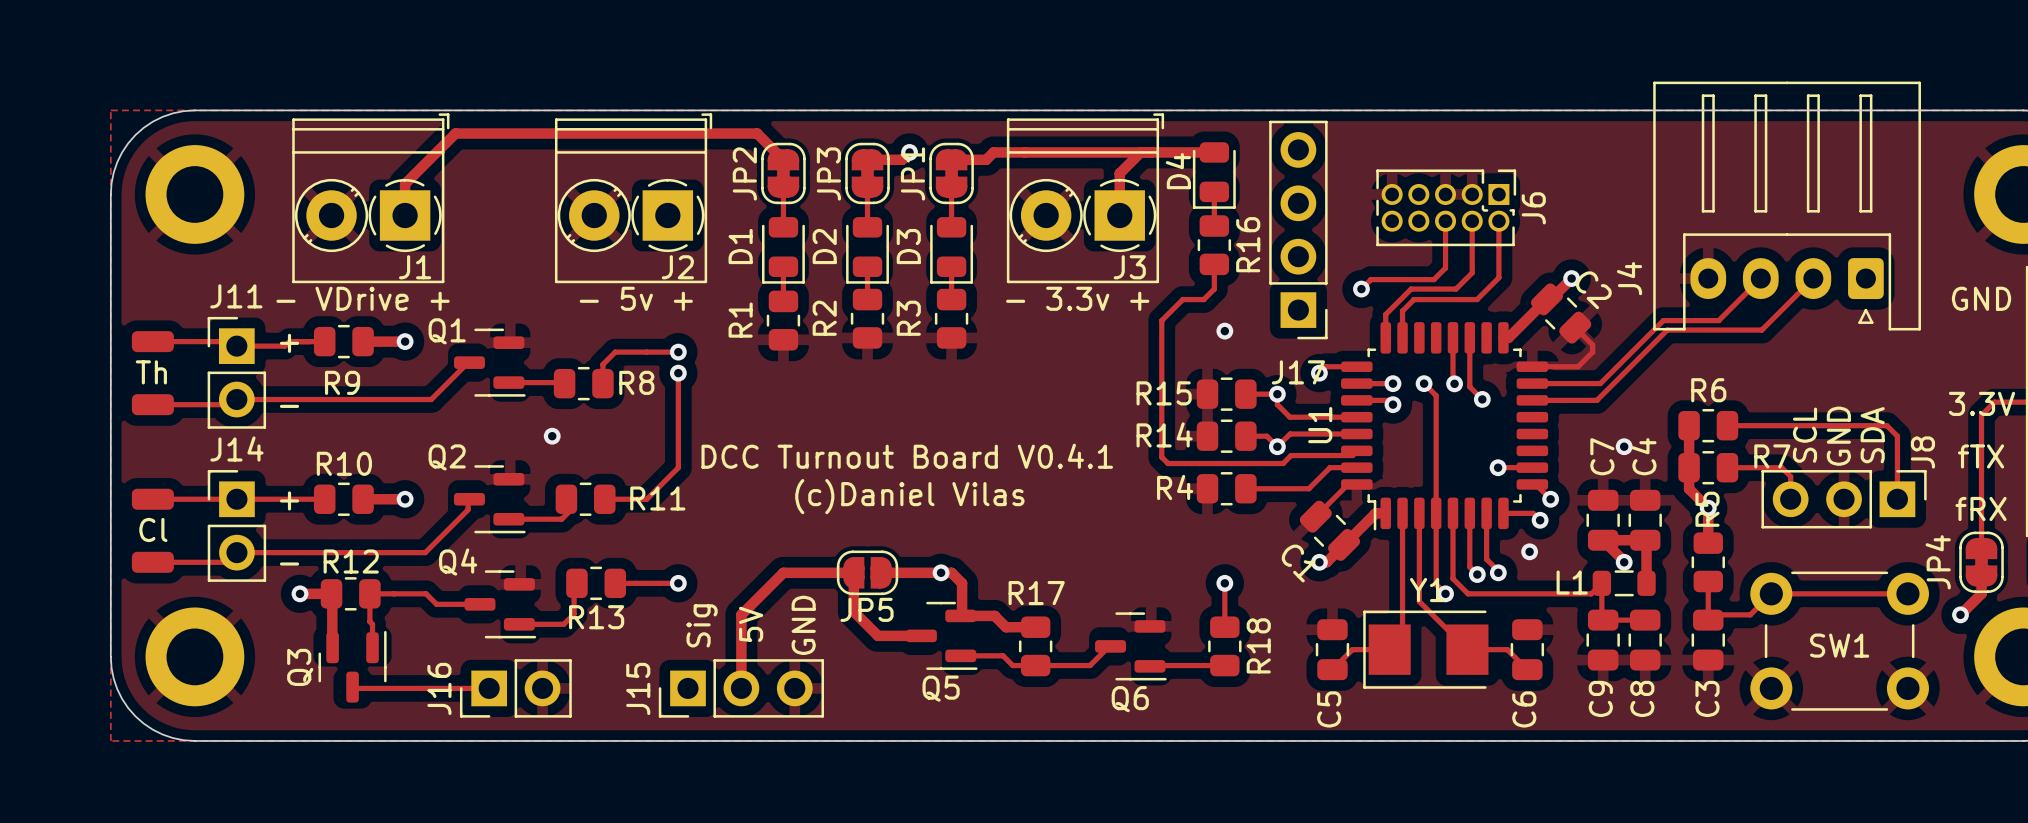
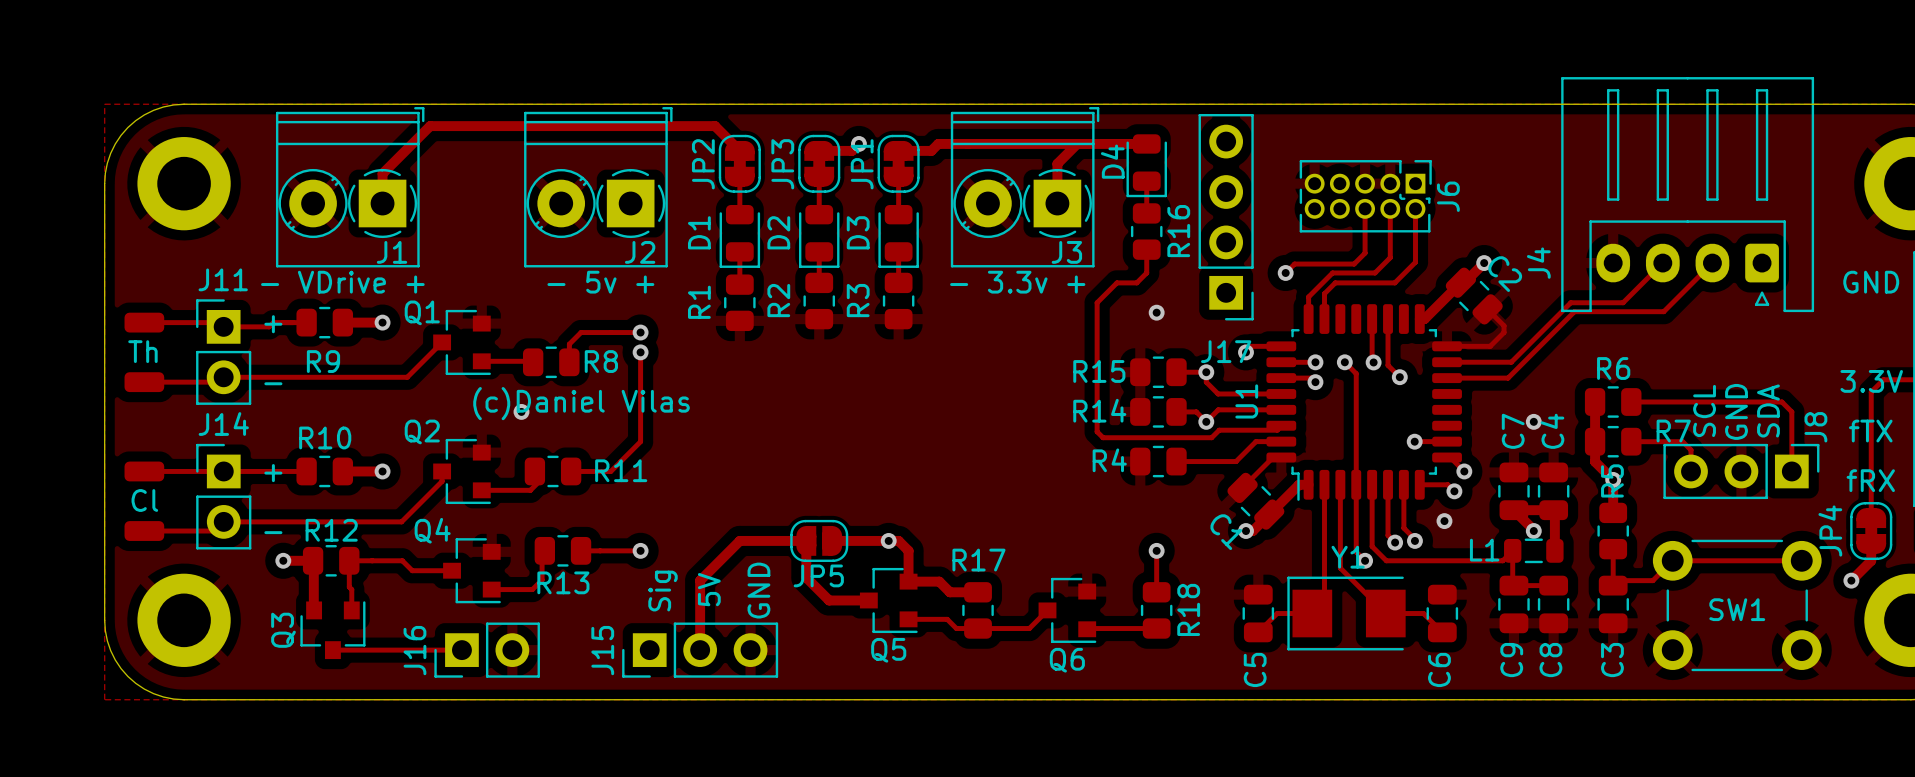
Q1 footprint: [453, 328, 526, 397] -> [433, 309, 491, 376]
text: DCC Turnout Board V0.4.1 (907, 456) -> none
Q2 footprint: [453, 465, 526, 534] -> [433, 438, 491, 505]
text position: (c)Daniel Vilas (909, 496) -> (c)Daniel Vilas (581, 403)
Q4 footprint: [464, 570, 537, 639] -> [443, 538, 501, 604]
Q5 footprint: [905, 601, 978, 670] -> [859, 567, 918, 634]
Q6 footprint: [1095, 612, 1167, 681] -> [1038, 577, 1097, 643]
Q3 footprint: [318, 630, 387, 703] -> [300, 601, 366, 660]

